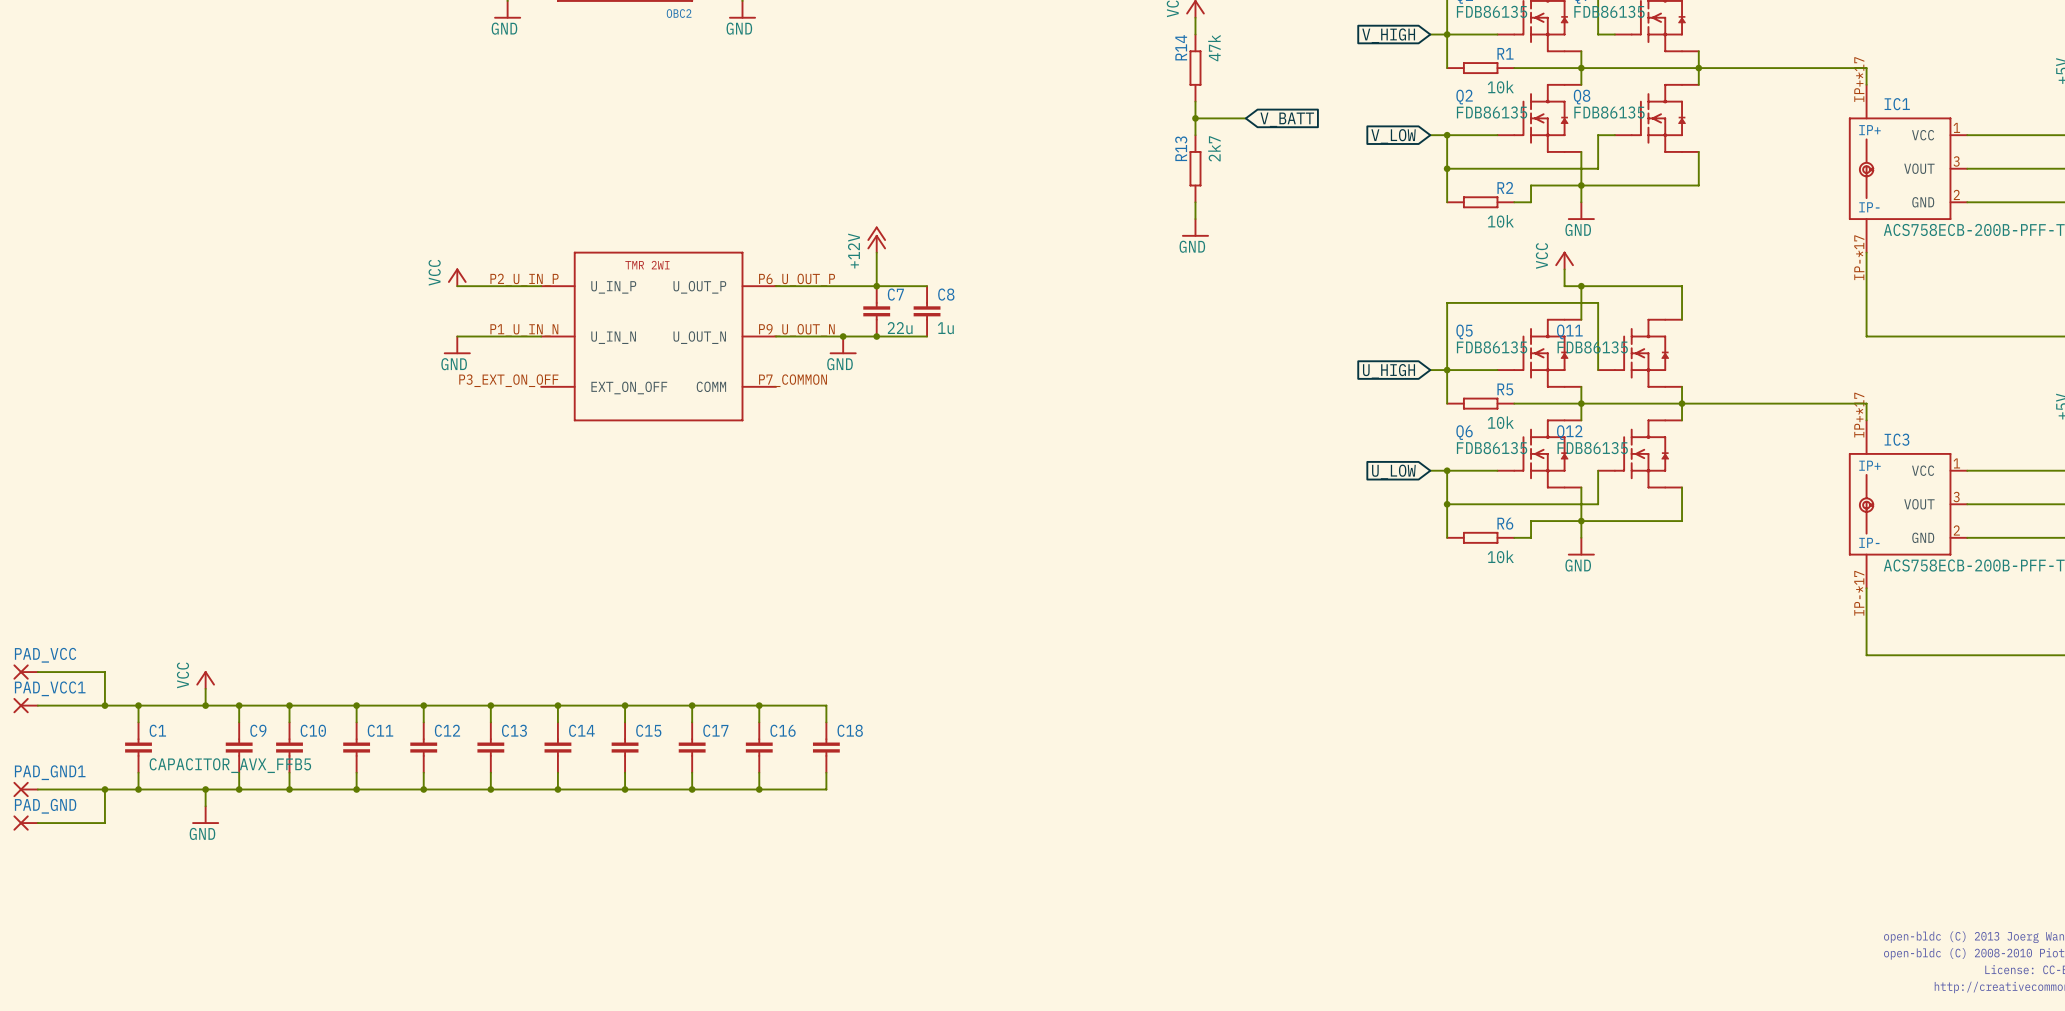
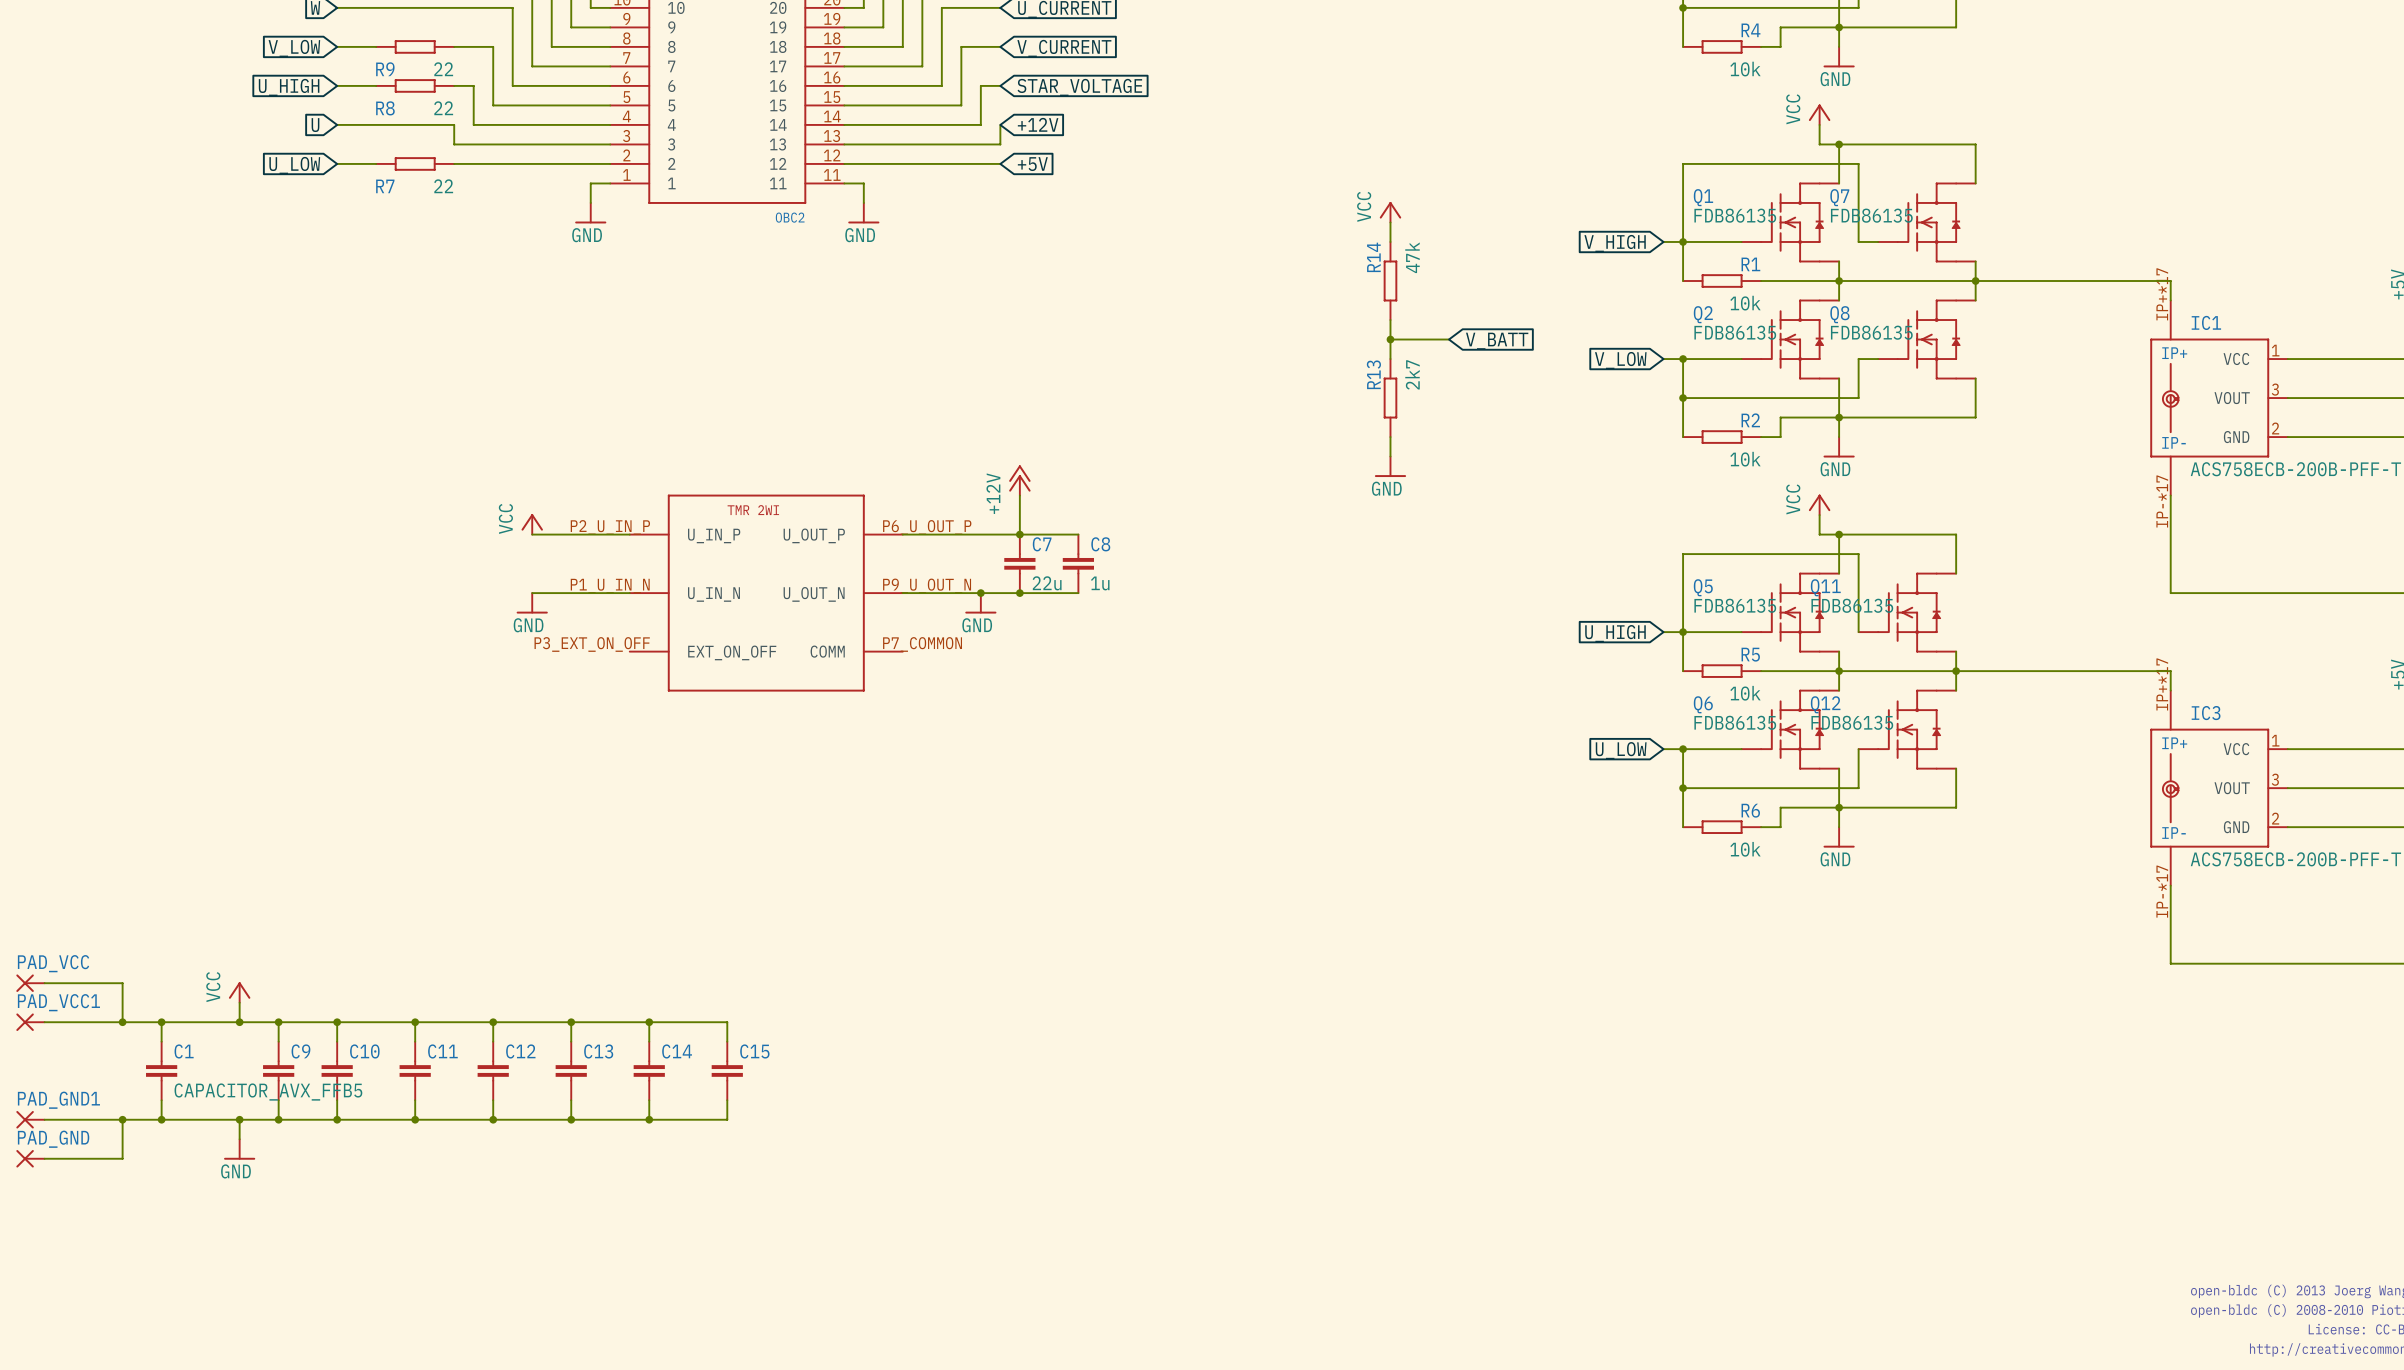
wire: (625, 705) (826, 705) (826, 722) -> none
junction: (625, 705) -> none
wire: (692, 705) (692, 722) -> none
junction: (692, 705) -> none
wire: (759, 705) (759, 722) -> none
junction: (759, 705) -> none
C17: (692, 747) -> none
C16: (759, 747) -> none
C18: (826, 747) -> none
wire: (692, 772) (692, 789) -> none
wire: (759, 772) (759, 789) -> none
wire: (826, 772) (826, 789) (625, 789) -> none
junction: (625, 789) -> none
junction: (692, 789) -> none
junction: (759, 789) -> none

